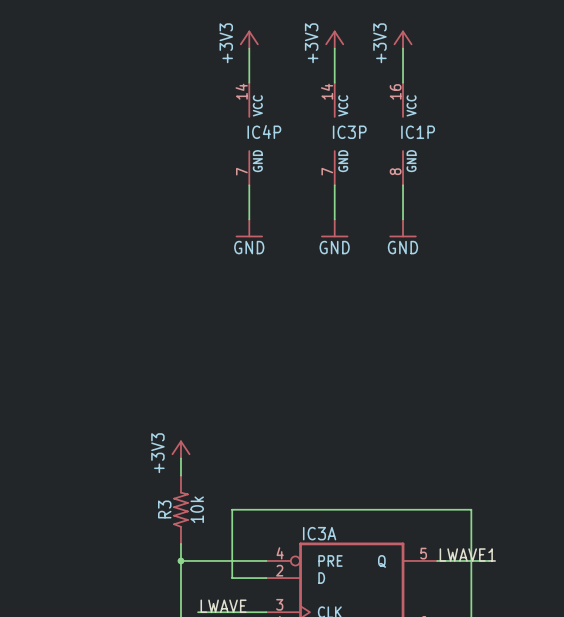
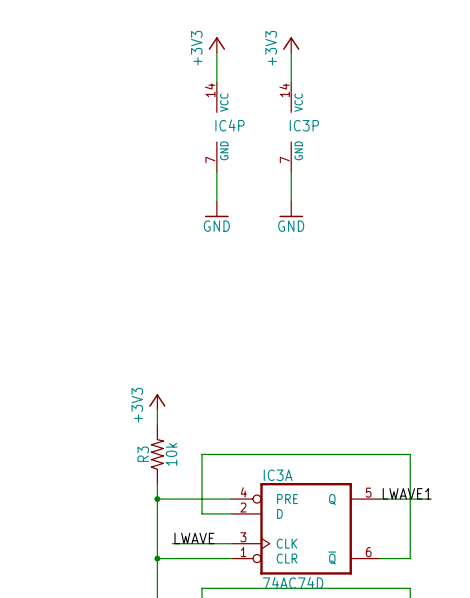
power symbol: +3V3 (403, 39) -> none
wire: (403, 48) (403, 82) -> none
IC1P: (403, 133) -> none
wire: (403, 185) (403, 219) -> none
power symbol: GND (403, 228) -> none

